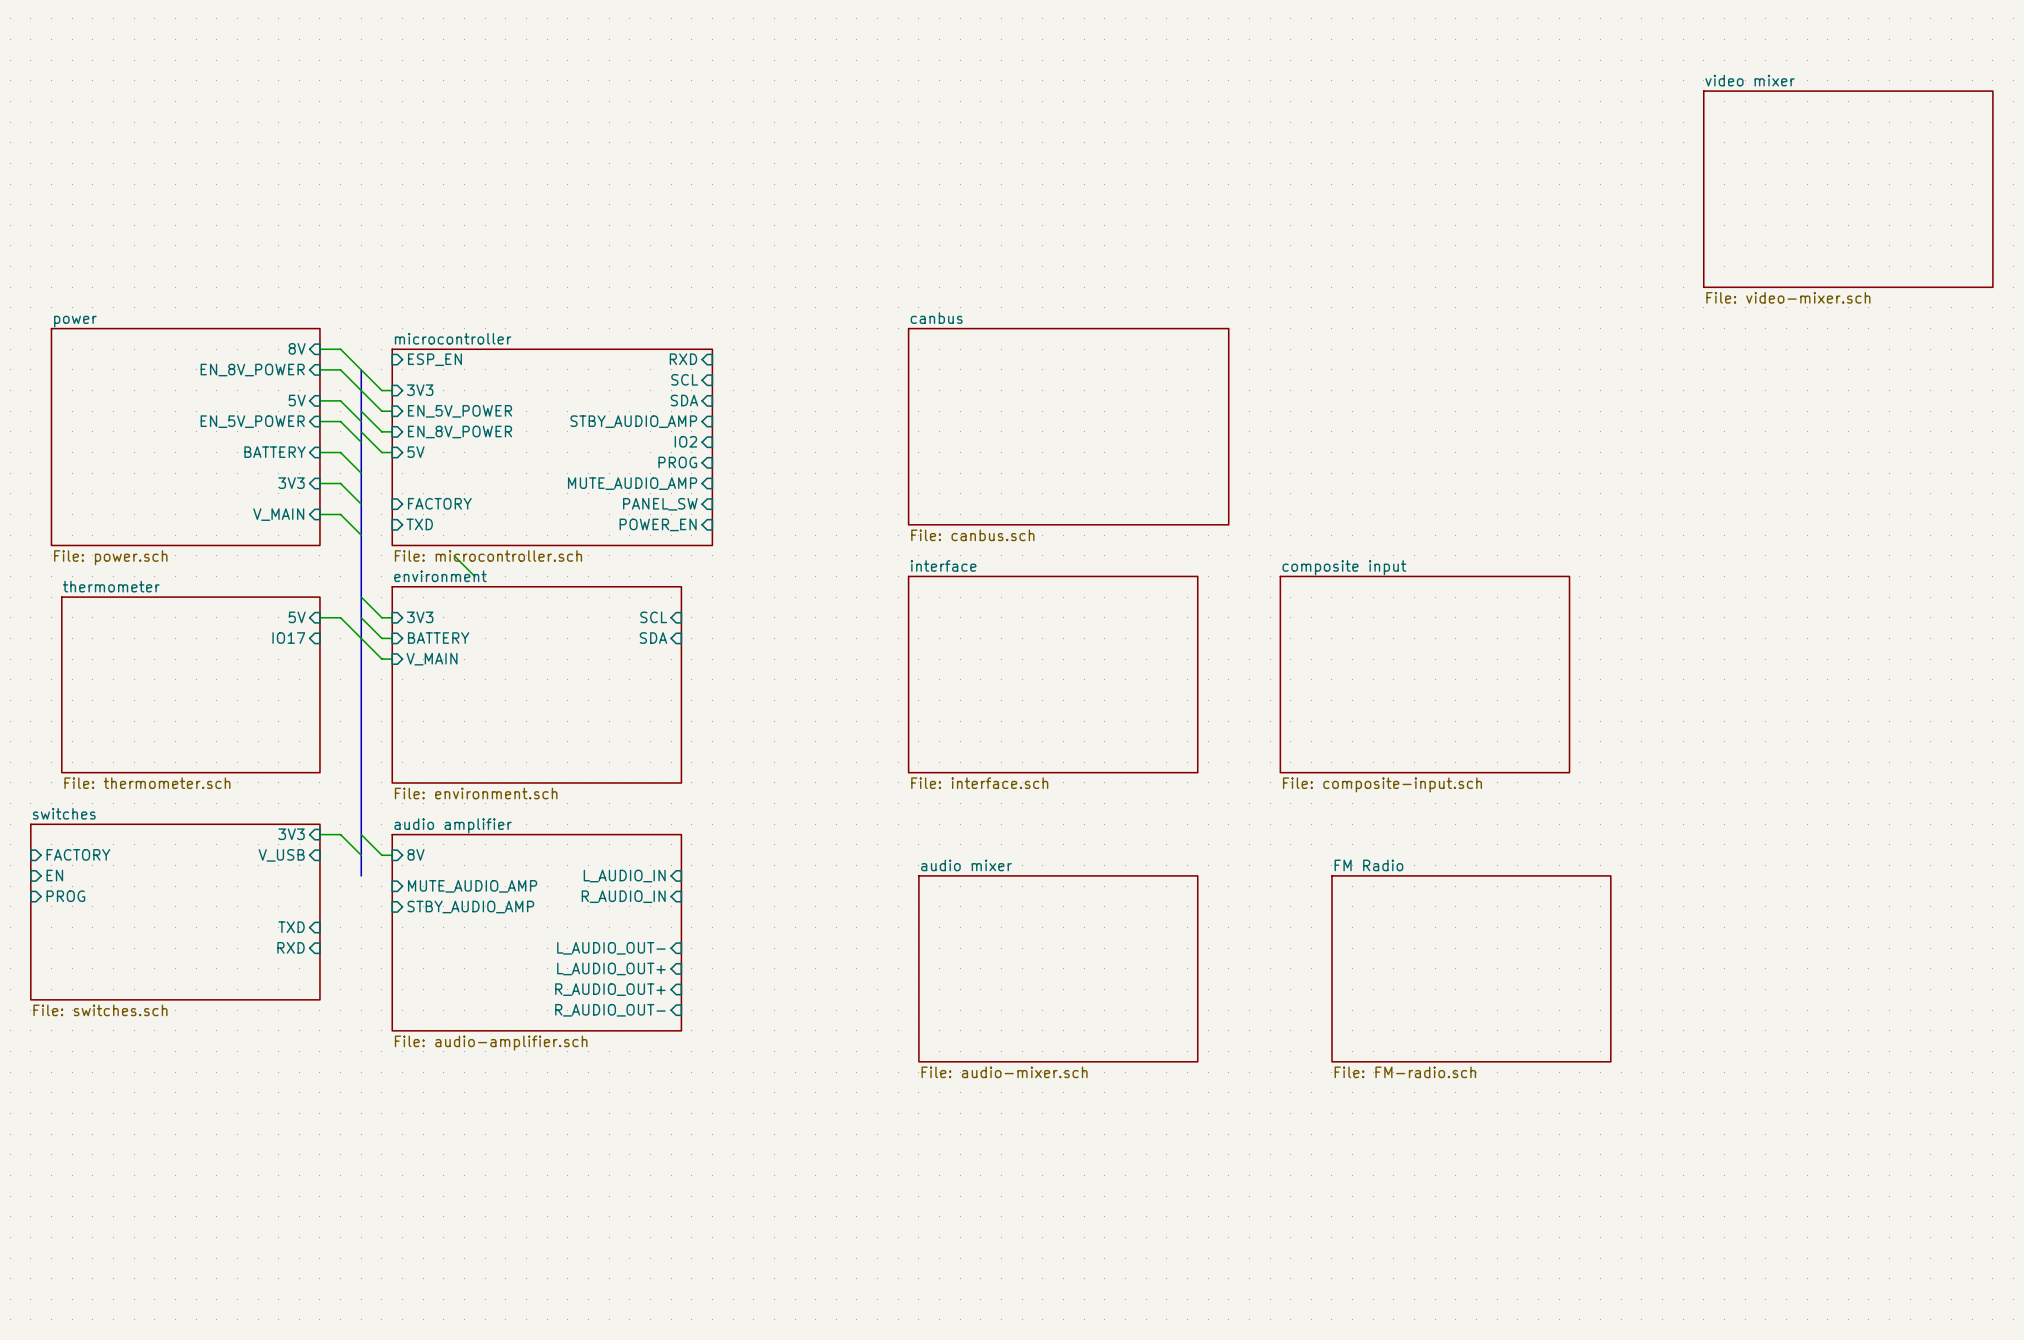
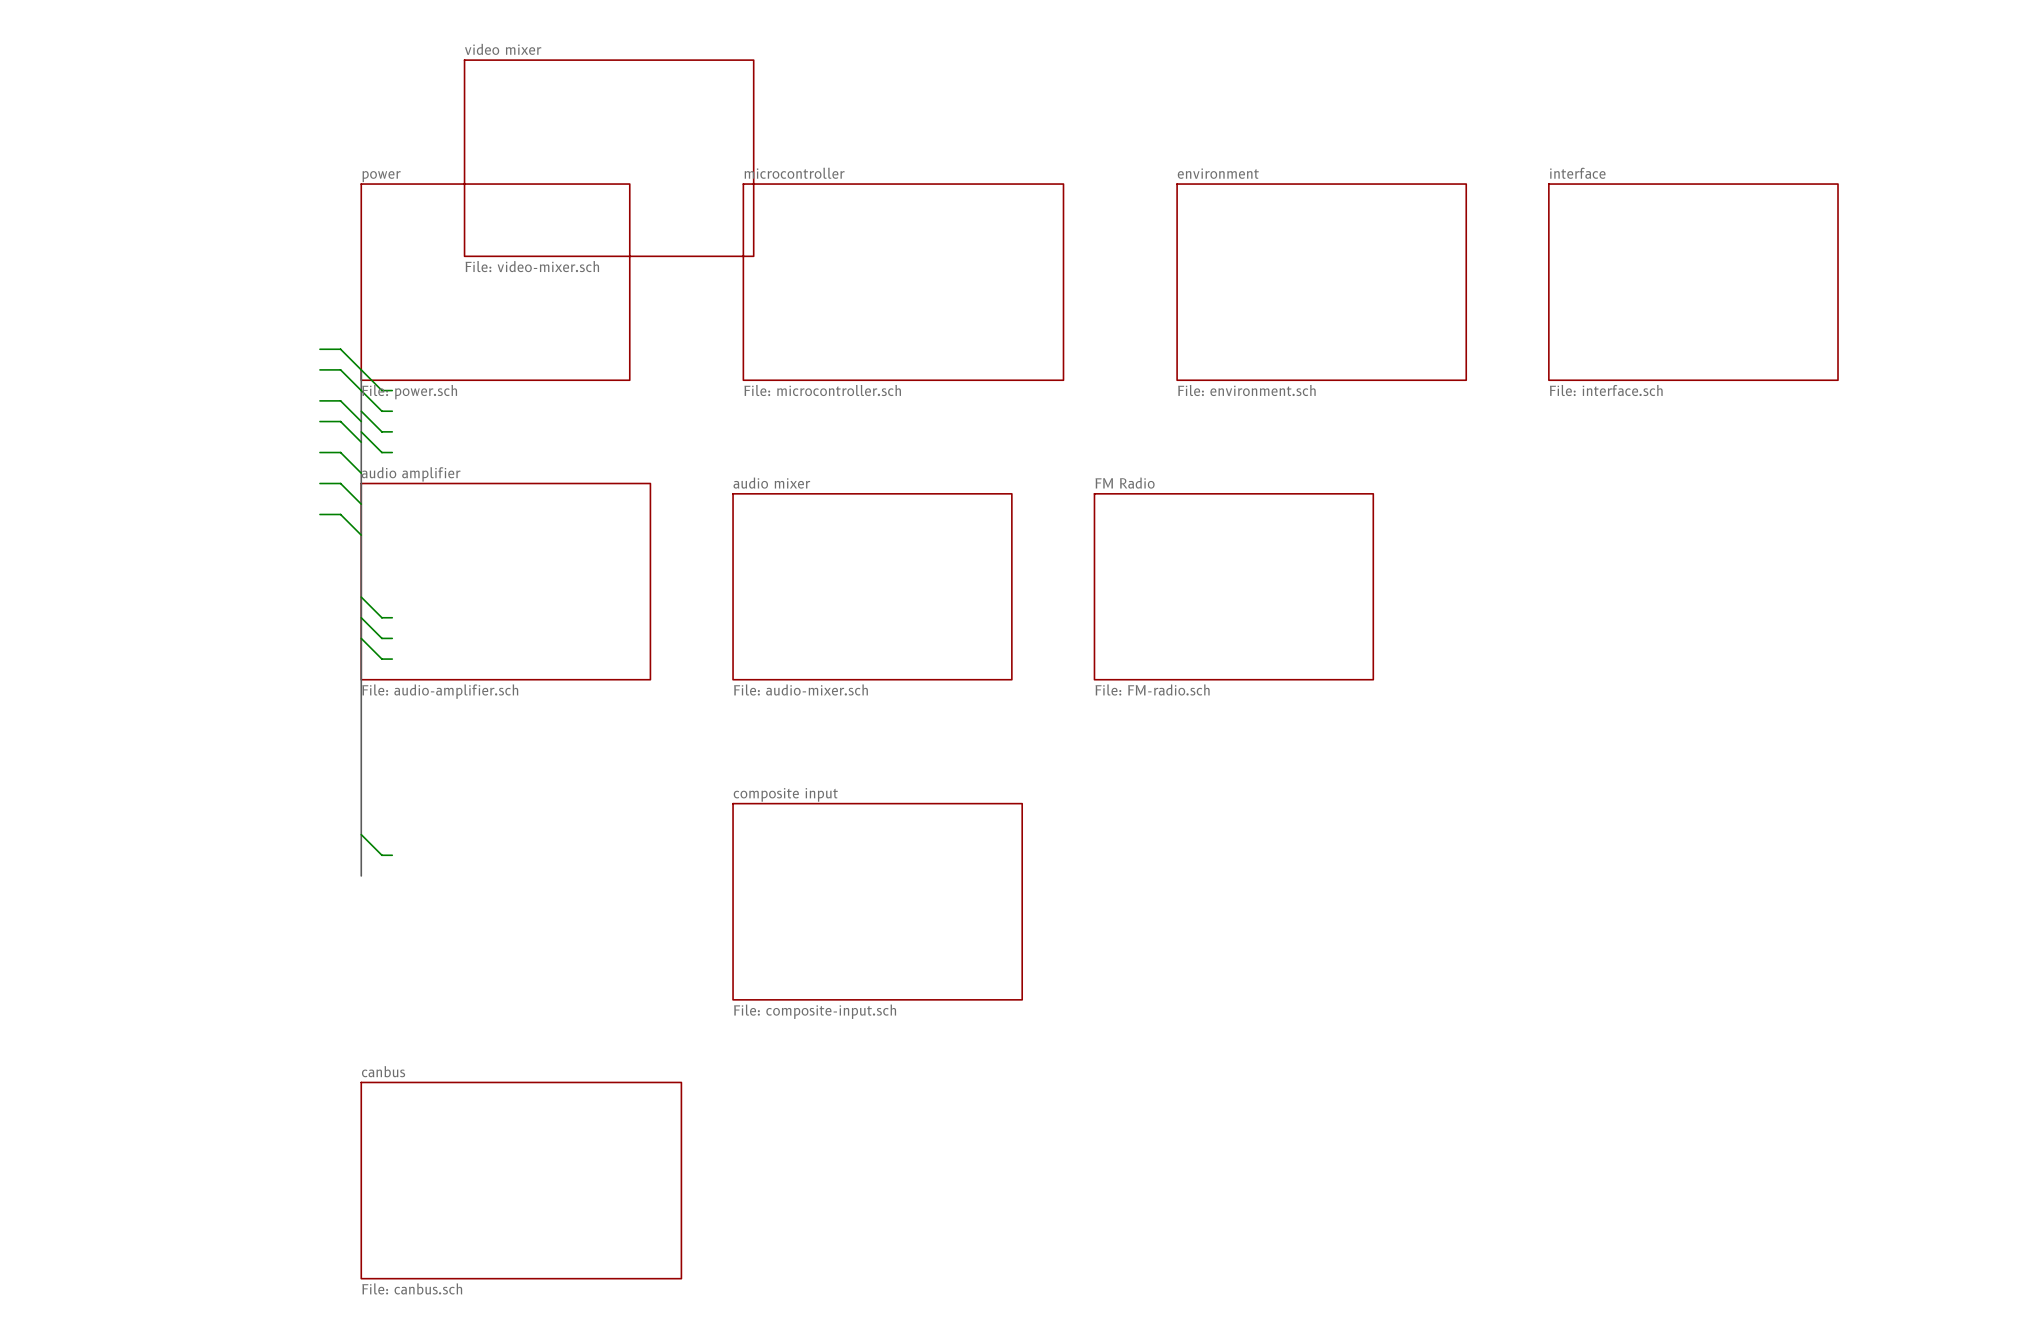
sheet video mixer: none -> File: video-mixer.sch (609, 158)
sheet video mixer: File: video-mixer.sch (1848, 189) -> none
sheet power: none -> File: power.sch (495, 282)
sheet microcontroller: none -> File: microcontroller.sch (903, 282)
sheet environment: none -> File: environment.sch (1321, 282)
sheet interface: none -> File: interface.sch (1693, 282)
sheet pin: 8V (297, 348) -> none
sheet pin: ESP_EN (434, 359) -> none
sheet pin: RXD (683, 359) -> none
sheet pin: EN_8V_POWER (252, 370) -> none
sheet pin: SCL (684, 379) -> none
sheet pin: 3V3 (420, 390) -> none
sheet pin: 5V (297, 400) -> none
sheet pin: SDA (684, 400) -> none
sheet pin: EN_5V_POWER (460, 411) -> none
sheet pin: EN_5V_POWER (252, 421) -> none
sheet pin: STBY_AUDIO_AMP (633, 421) -> none
sheet canbus: File: canbus.sch (1068, 426) -> none
sheet pin: EN_8V_POWER (460, 431) -> none
sheet power: File: power.sch (185, 437) -> none
sheet pin: IO2 (685, 441) -> none
sheet microcontroller: File: microcontroller.sch (552, 447) -> none
sheet pin: BATTERY (275, 452) -> none
sheet pin: 5V (416, 452) -> none
sheet pin: PROG (677, 462) -> none
sheet pin: 3V3 (291, 483) -> none
sheet pin: MUTE_AUDIO_AMP (632, 483) -> none
sheet pin: FACTORY (439, 503) -> none
sheet pin: PANEL_SW (660, 504) -> none
sheet pin: V_MAIN (278, 514) -> none
sheet pin: TXD (419, 524) -> none
sheet pin: POWER_EN (658, 524) -> none
wire: (454, 555) (474, 576) -> none
sheet audio amplifier: none -> File: audio-amplifier.sch (505, 581)
sheet audio mixer: none -> File: audio-mixer.sch (872, 586)
sheet FM Radio: none -> File: FM-radio.sch (1233, 586)
sheet pin: 5V (297, 617) -> none
wire: (319, 617) (340, 617) (361, 638) -> none
sheet pin: 3V3 (420, 617) -> none
sheet pin: SCL (653, 617) -> none
sheet pin: IO17 (288, 638) -> none
sheet pin: BATTERY (438, 638) -> none
sheet pin: SDA (653, 638) -> none
sheet pin: V_MAIN (432, 659) -> none
sheet interface: File: interface.sch (1053, 674) -> none
sheet composite input: File: composite-input.sch (1424, 674) -> none
sheet thermometer: File: thermometer.sch (190, 684) -> none
sheet environment: File: environment.sch (536, 684) -> none
sheet pin: 3V3 (291, 834) -> none
wire: (319, 834) (340, 834) (361, 855) -> none
sheet pin: FACTORY (78, 854) -> none
sheet pin: 8V (416, 854) -> none
sheet pin: V_USB (281, 855) -> none
sheet pin: EN (54, 875) -> none
sheet pin: L_AUDIO_IN (624, 876) -> none
sheet pin: MUTE_AUDIO_AMP (472, 886) -> none
sheet pin: PROG (65, 896) -> none
sheet pin: R_AUDIO_IN (623, 896) -> none
sheet composite input: none -> File: composite-input.sch (877, 901)
sheet pin: STBY_AUDIO_AMP (470, 907) -> none
sheet switches: File: switches.sch (175, 912) -> none
sheet pin: TXD (291, 927) -> none
sheet audio amplifier: File: audio-amplifier.sch (536, 932) -> none
sheet pin: RXD (291, 947) -> none
sheet pin: L_AUDIO_OUT- (611, 948) -> none
sheet pin: L_AUDIO_OUT+ (611, 968) -> none
sheet audio mixer: File: audio-mixer.sch (1058, 968) -> none
sheet FM Radio: File: FM-radio.sch (1471, 968) -> none
sheet pin: R_AUDIO_OUT+ (610, 989) -> none
sheet pin: R_AUDIO_OUT- (610, 1010) -> none
sheet canbus: none -> File: canbus.sch (521, 1180)

